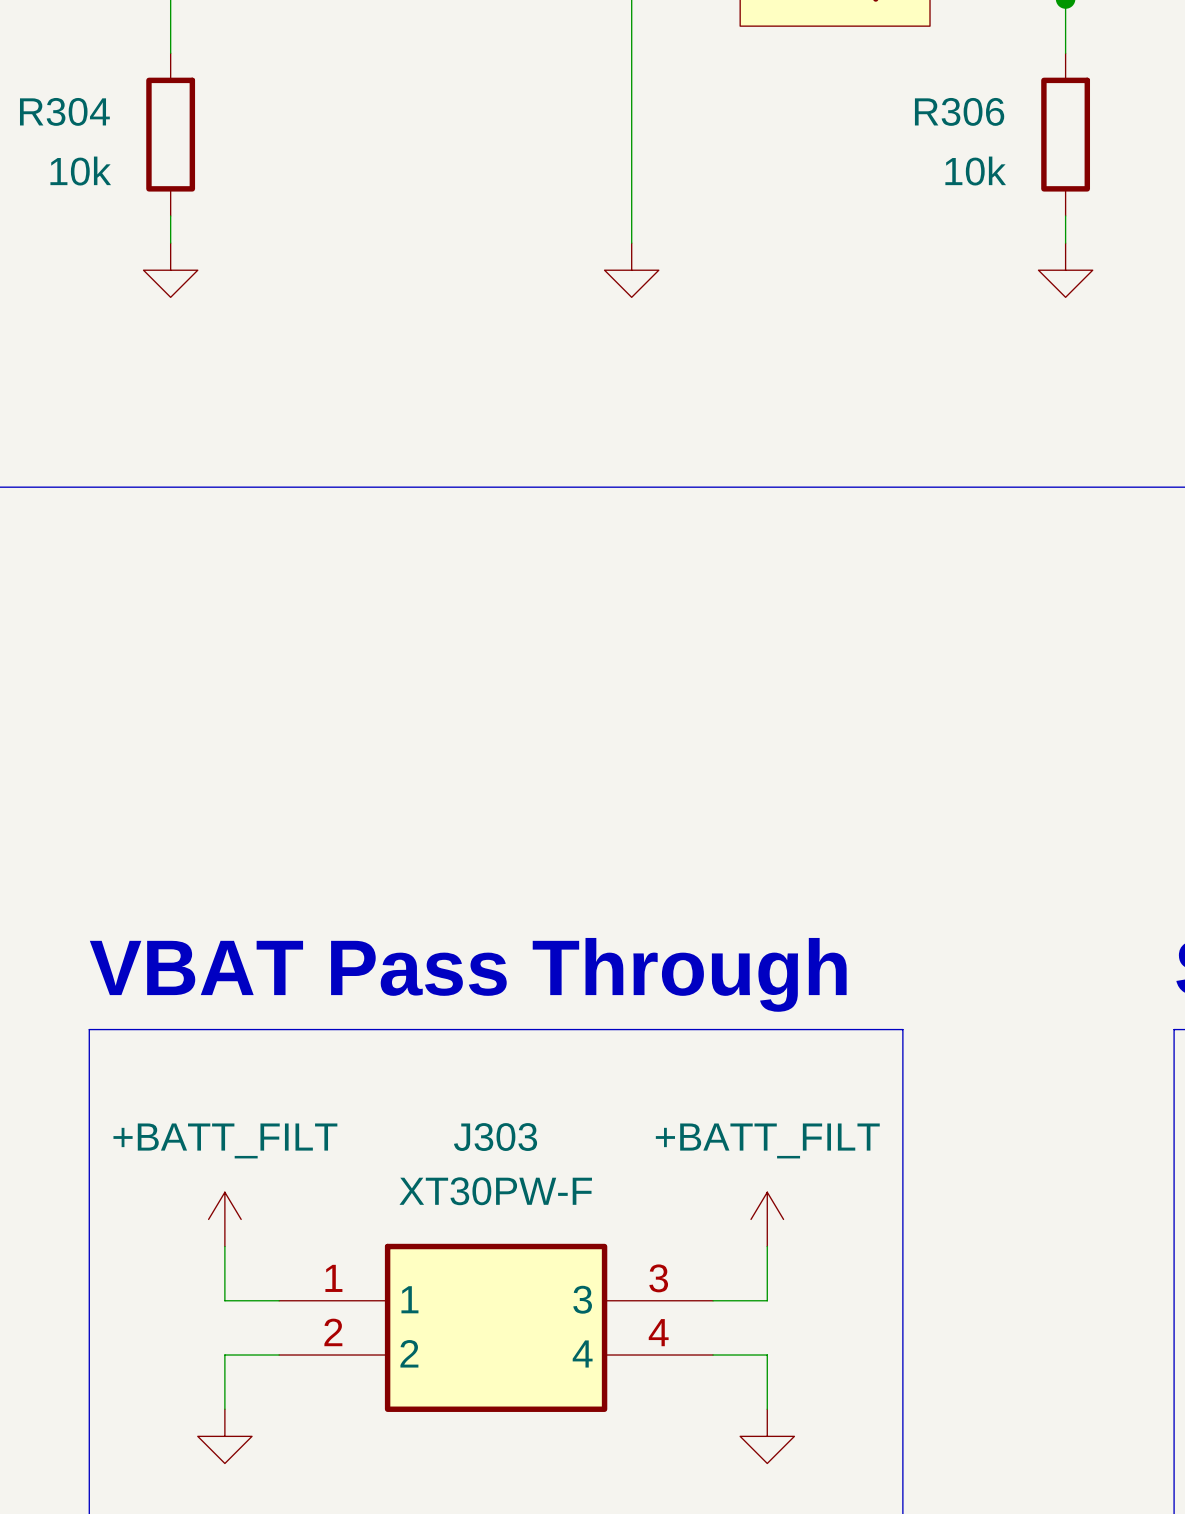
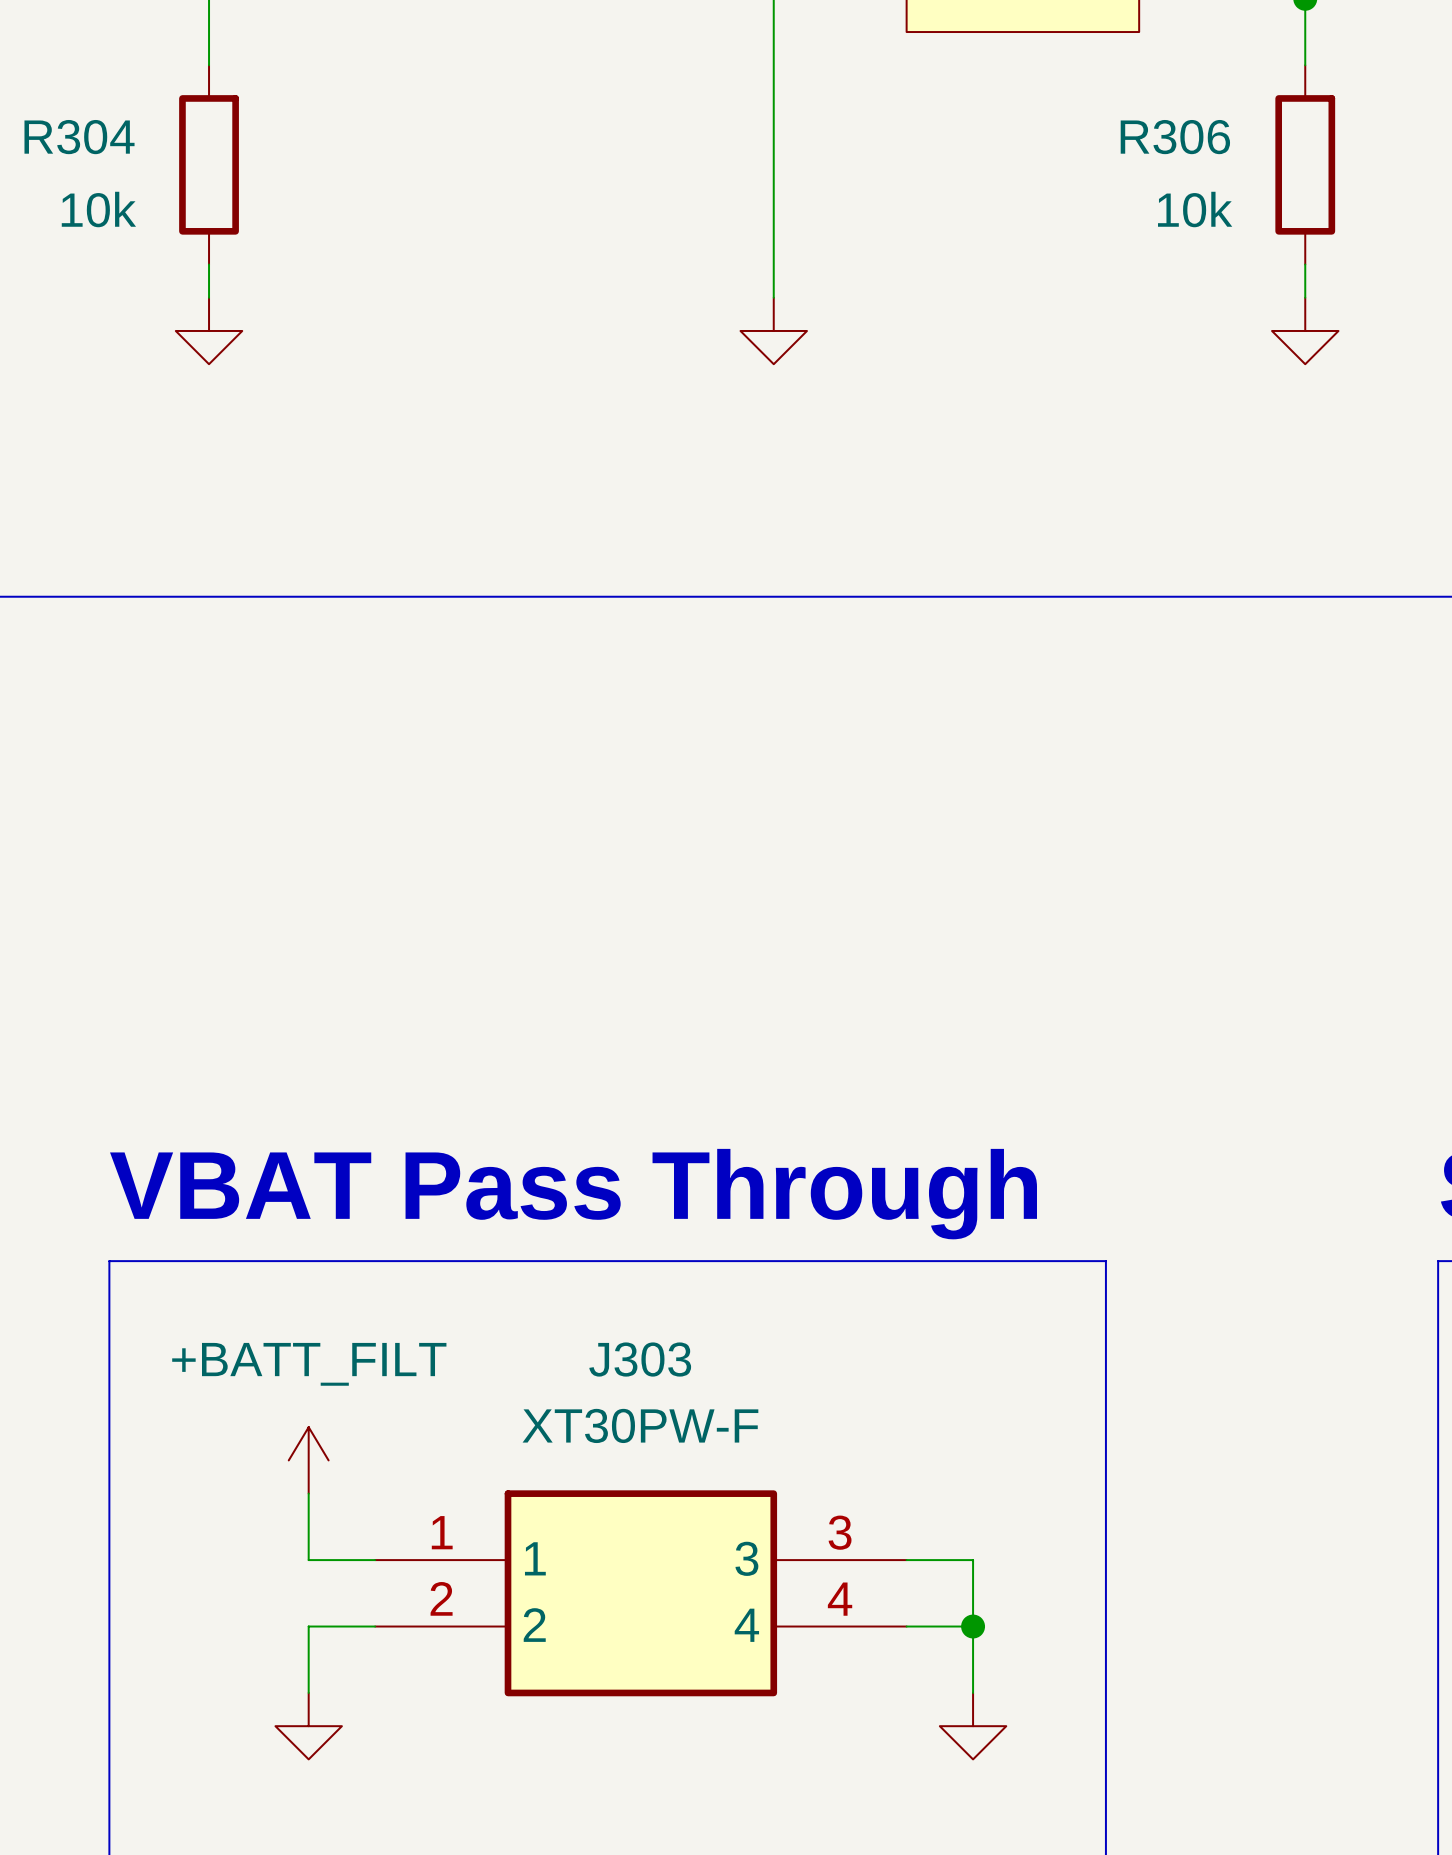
power symbol position: +BATT_FILT (224, 1219) -> +BATT_FILT (308, 1460)
power symbol: +BATT_FILT (767, 1219) -> none
wire: (224, 1246) (224, 1300) (279, 1300) -> (308, 1493) (308, 1560) (375, 1560)
wire: (767, 1246) (767, 1300) (713, 1300) -> none
wire: none -> (906, 1560) (973, 1560) (973, 1692)
J303 position: (496, 1327) -> (640, 1593)
wire: none -> (906, 1626) (973, 1626)
junction: none -> (973, 1626)
wire: (279, 1355) (224, 1355) (224, 1409) -> (375, 1626) (308, 1626) (308, 1692)
wire: (713, 1355) (767, 1355) (767, 1409) -> none
power symbol position: (224, 1436) -> (308, 1726)
power symbol position: (767, 1436) -> (973, 1726)

